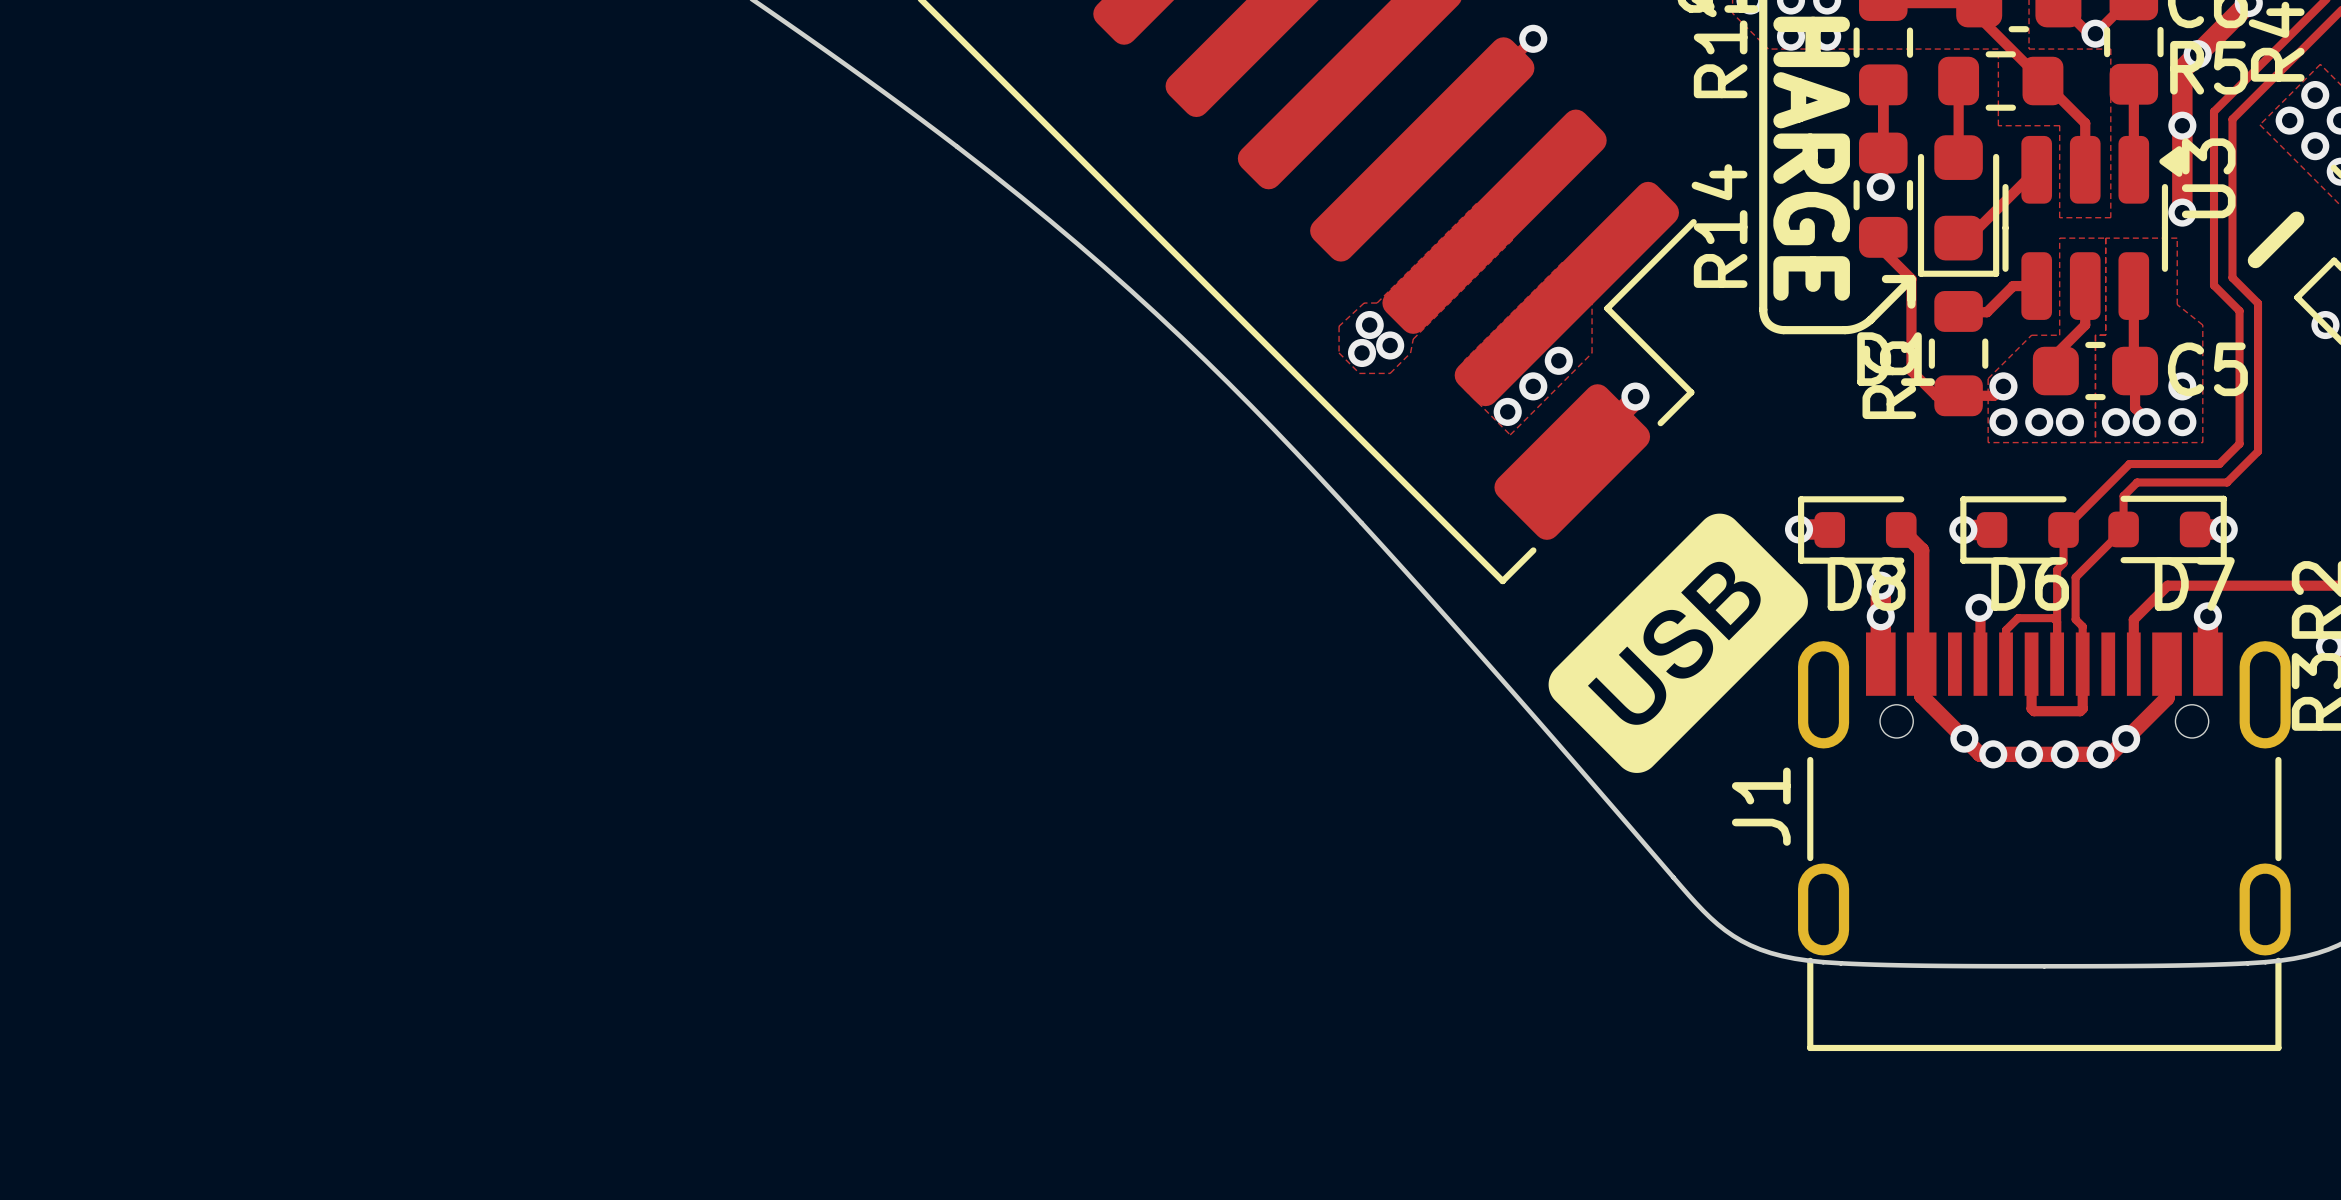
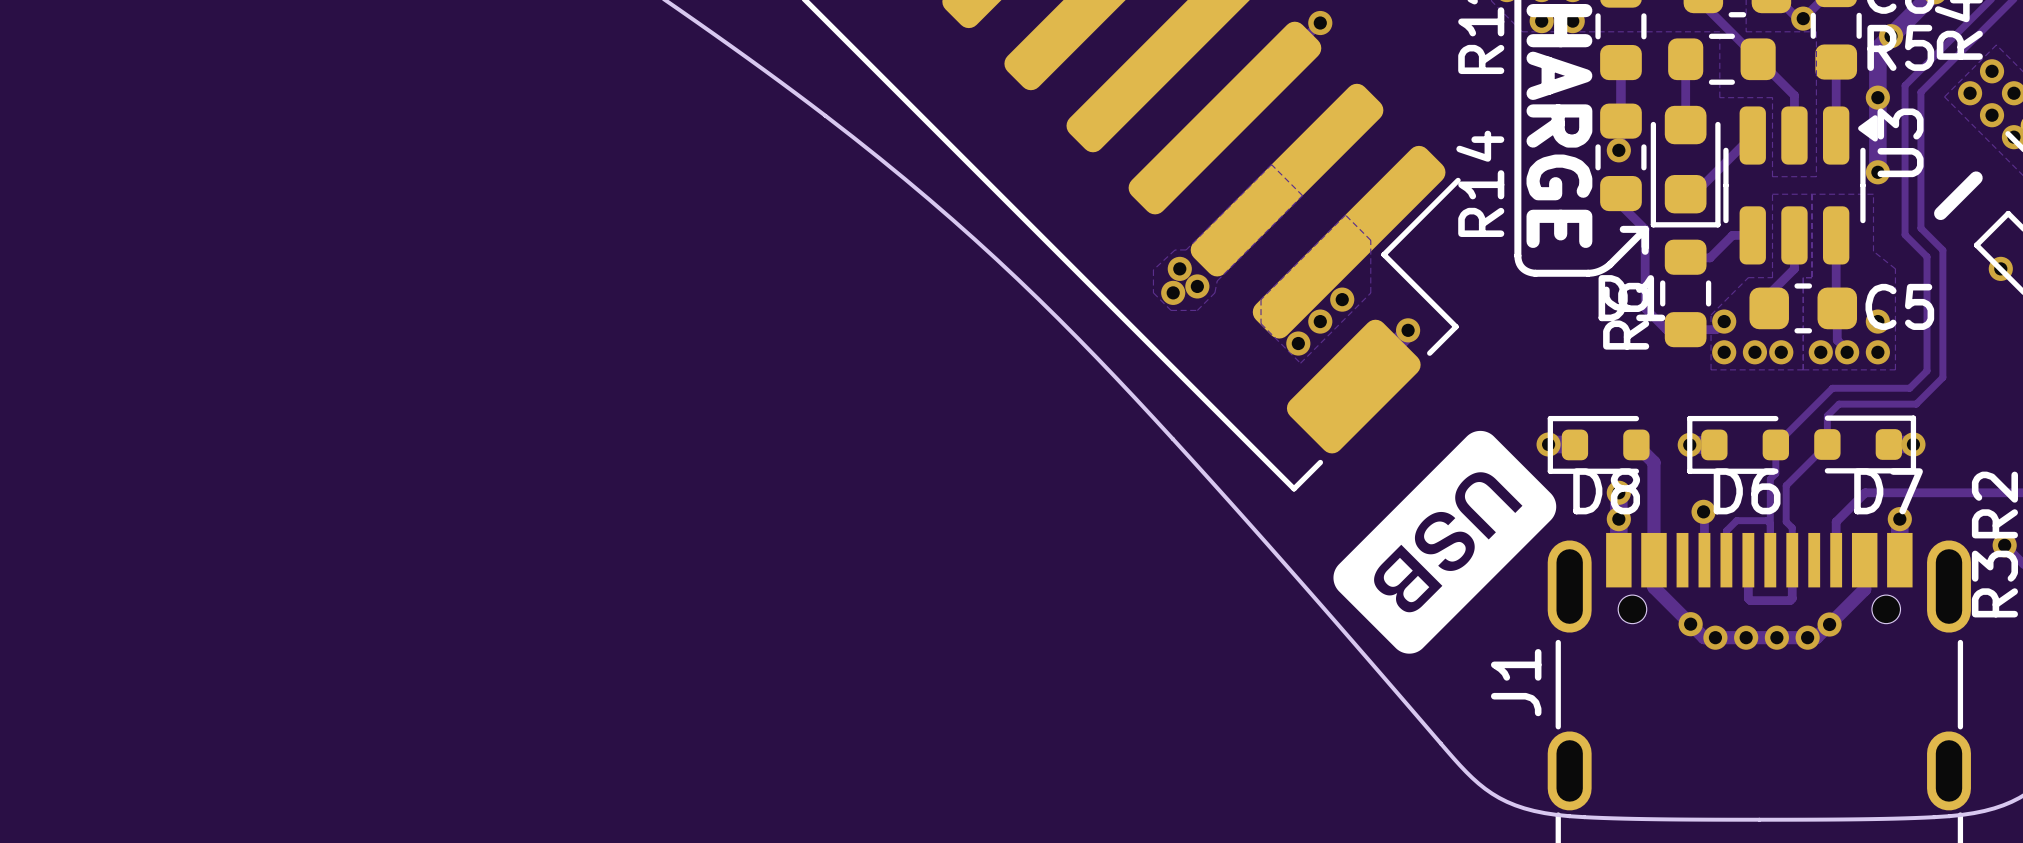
drawing shape: [1548, 513, 1808, 773] -> [1333, 430, 1557, 654]
drawing: [1696, 573, 1750, 626] -> none
drawing: none -> [1383, 557, 1430, 603]

